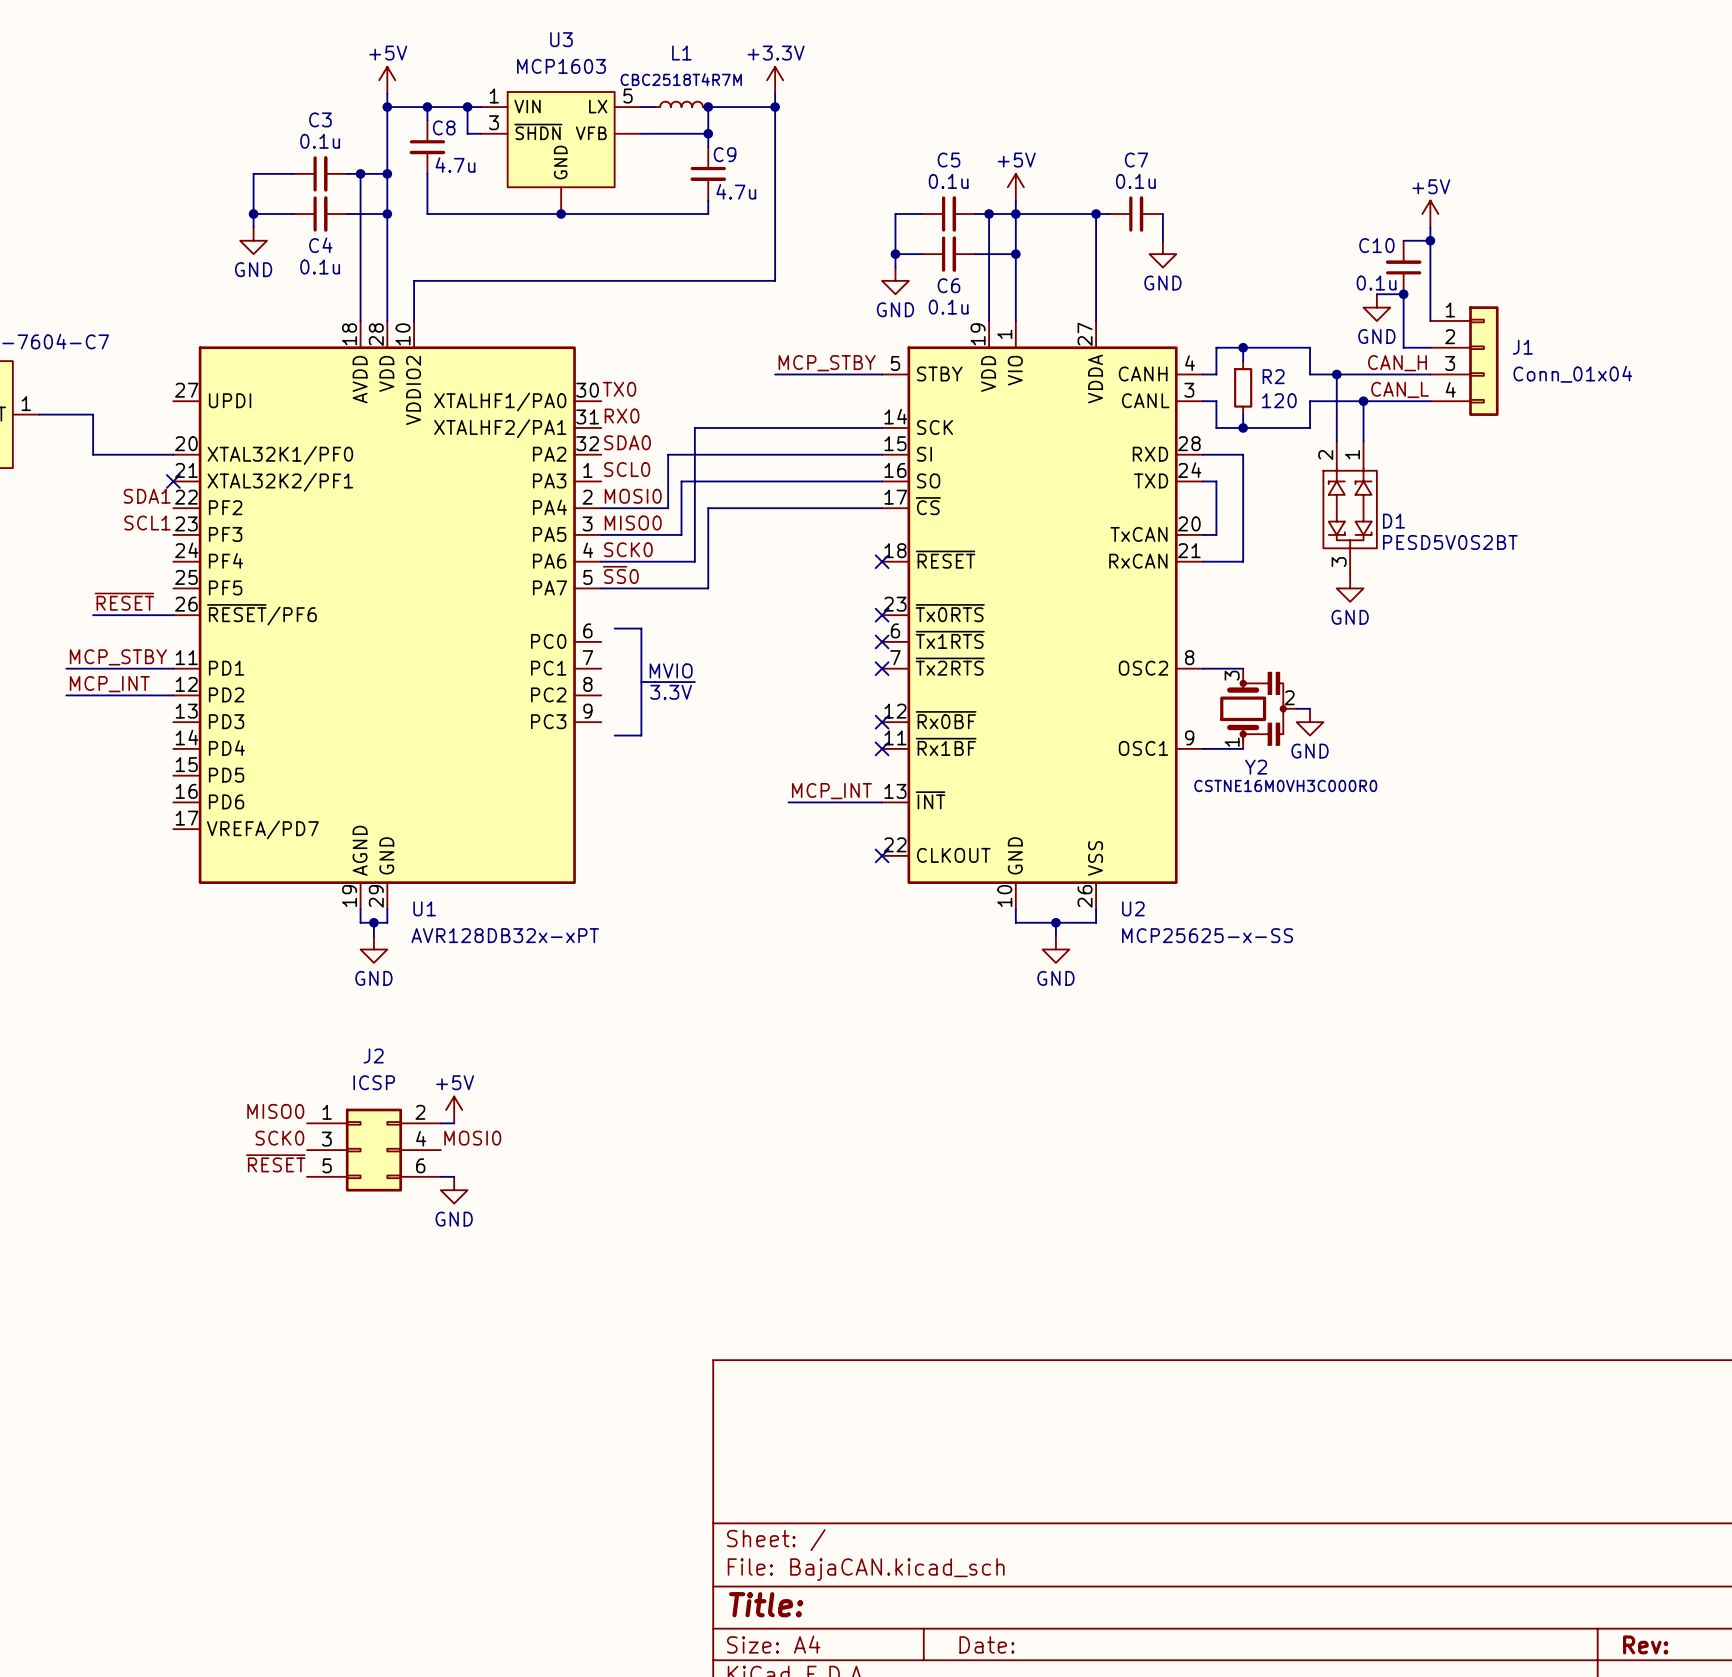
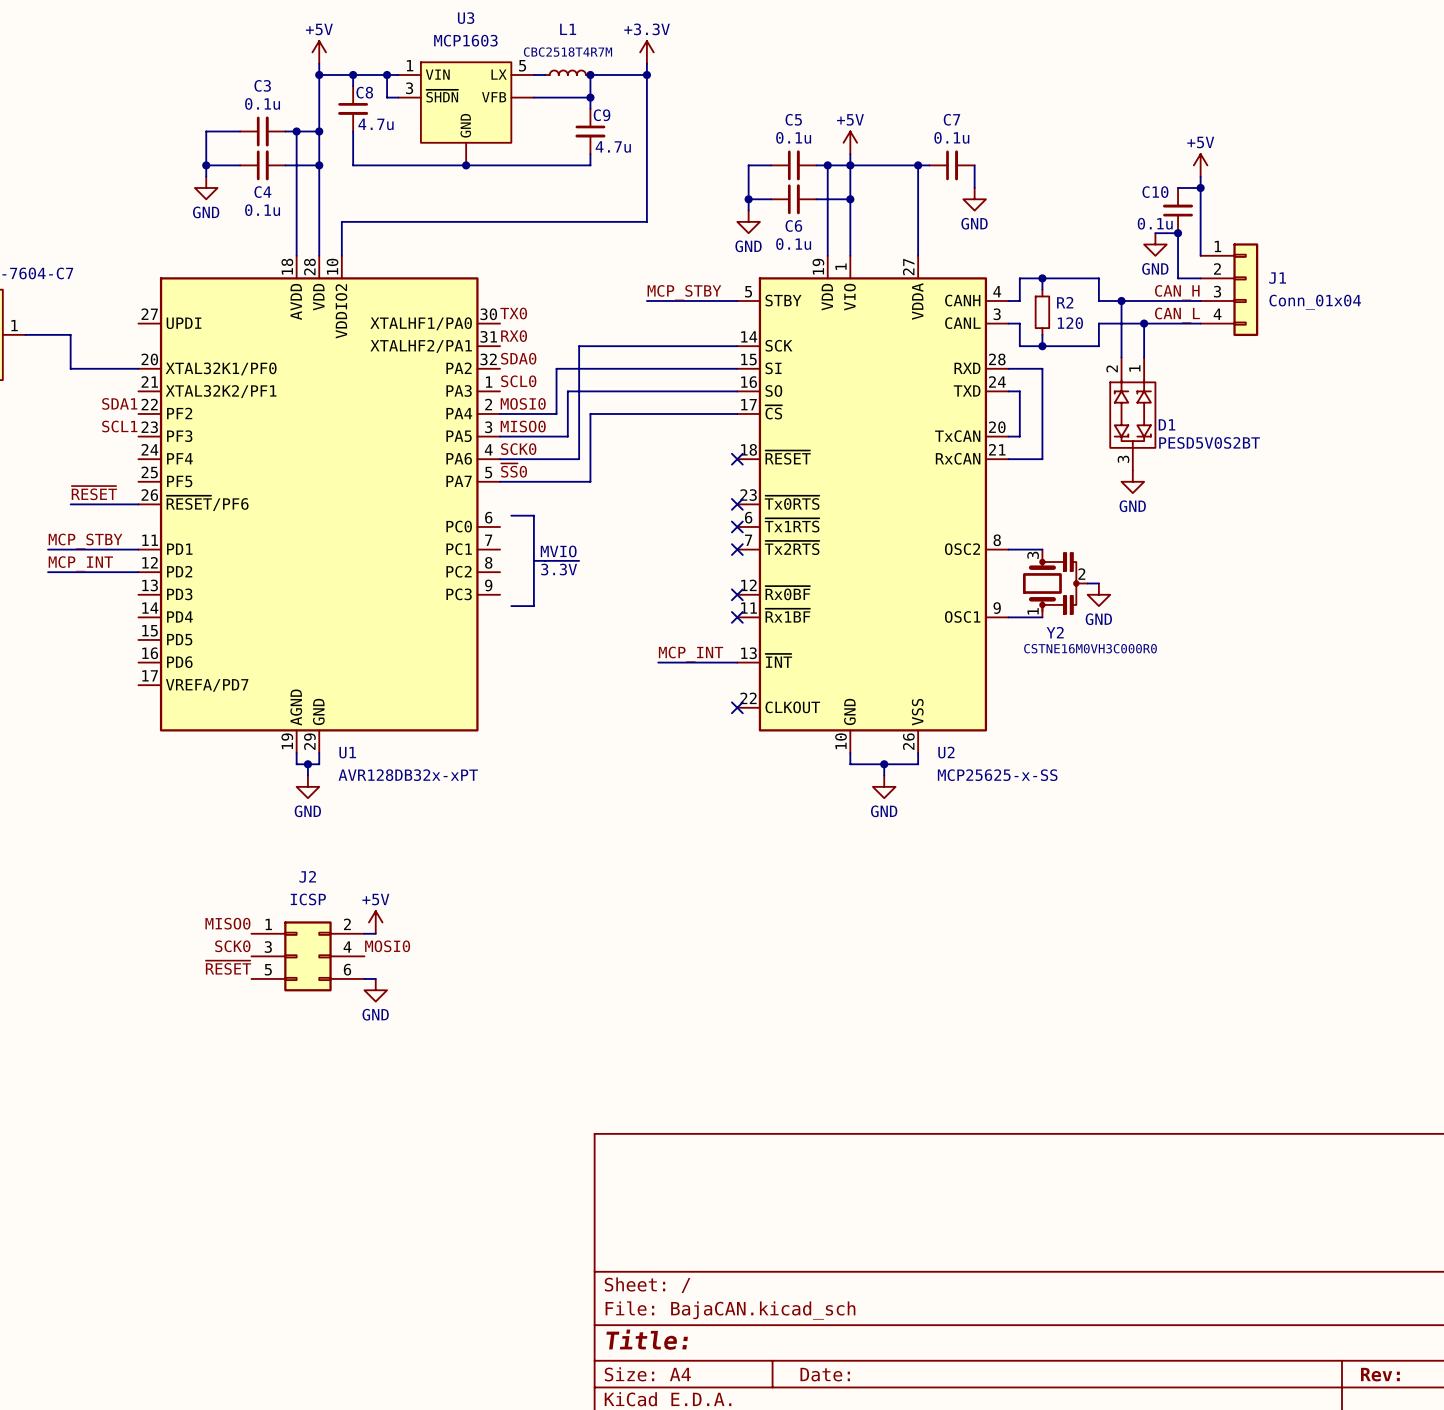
no-connect mark: (173, 481) -> none

